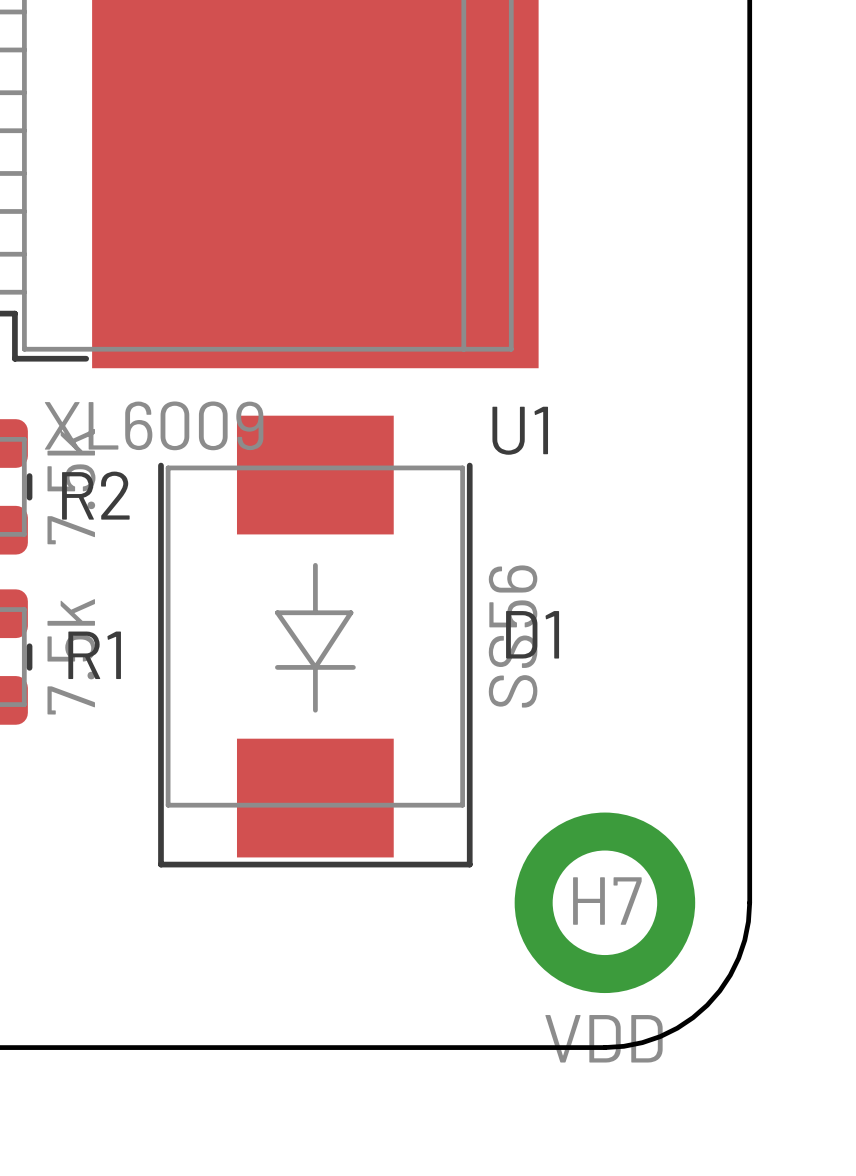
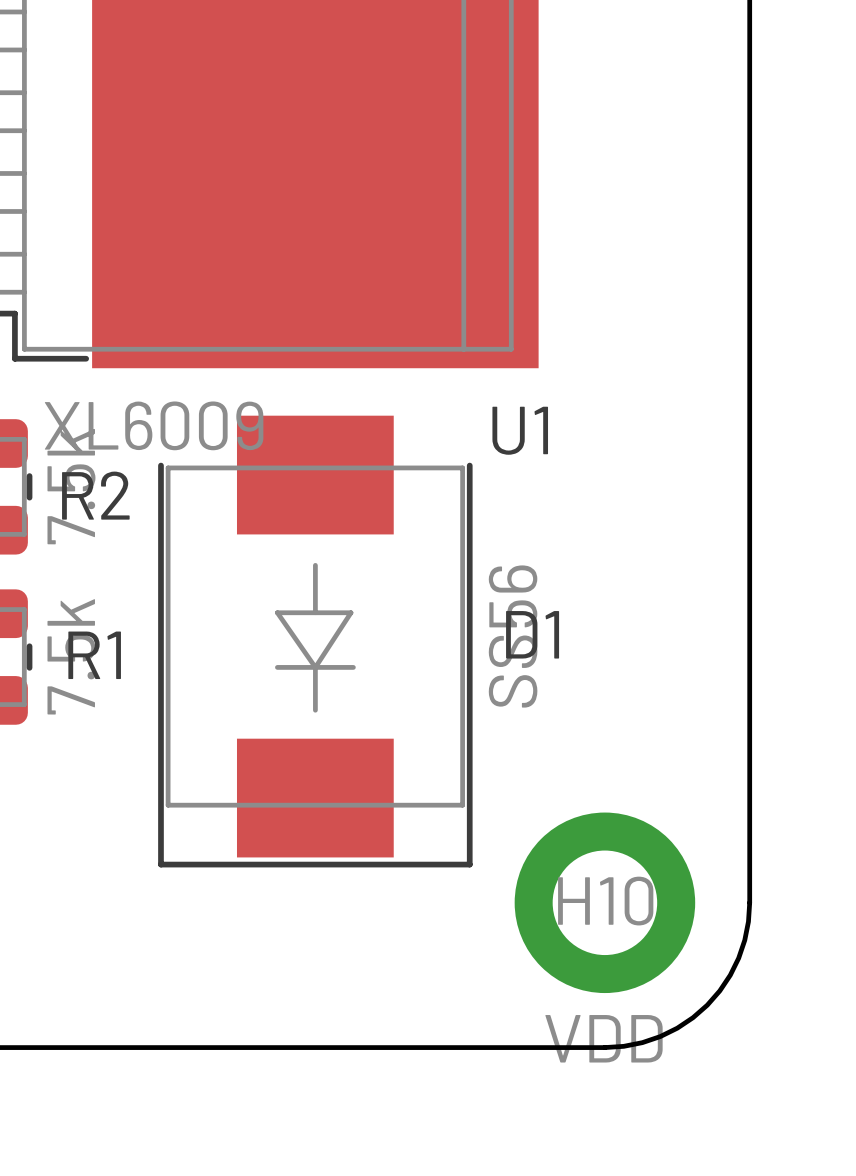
H7 name: H7 (607, 901) -> H10 (605, 901)

